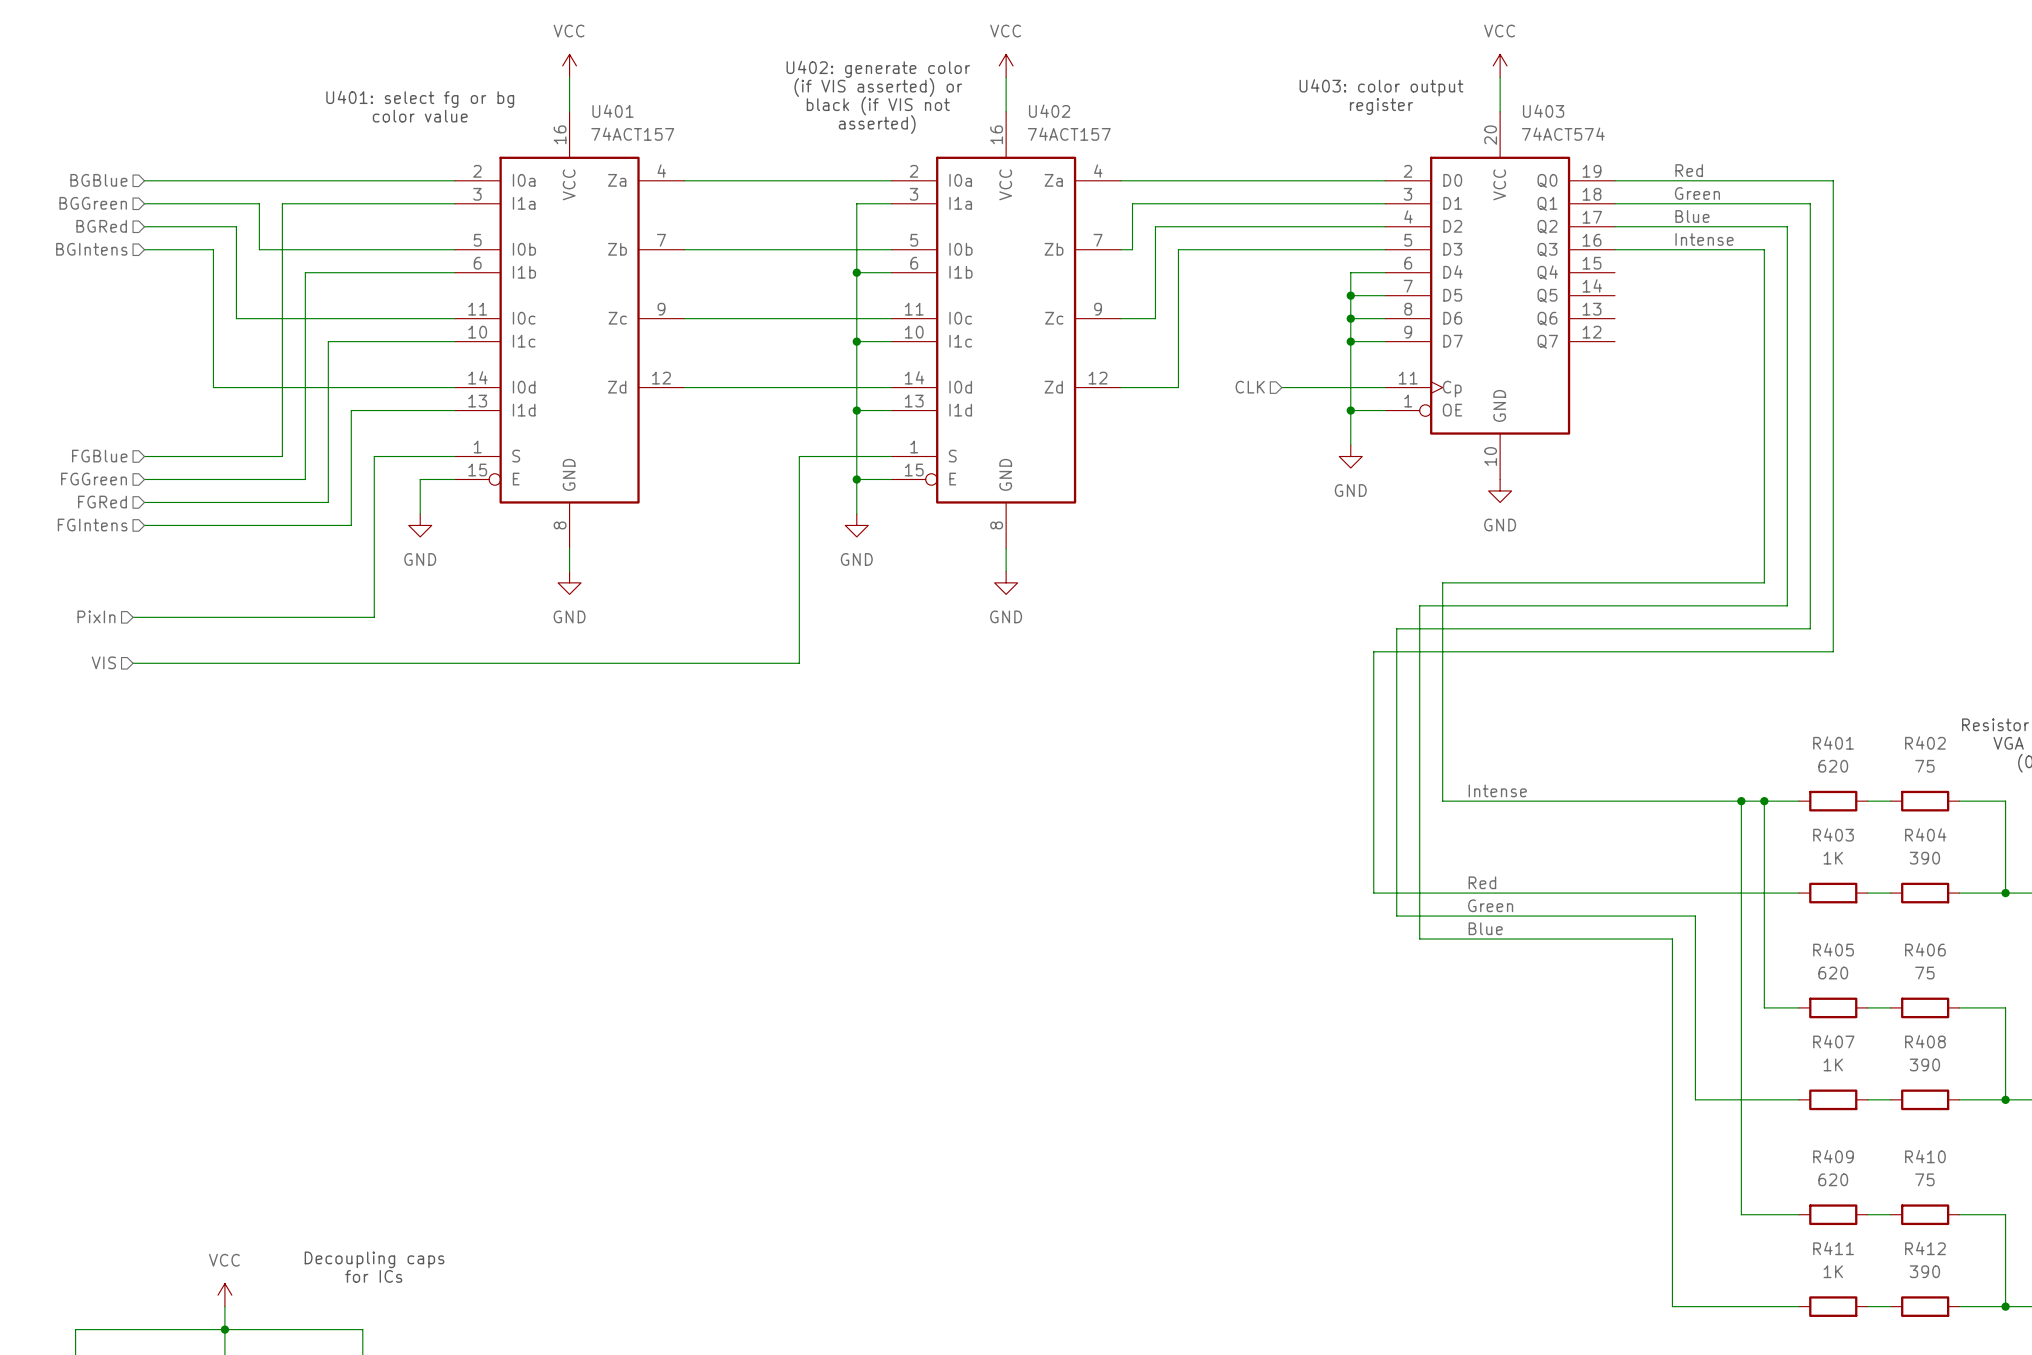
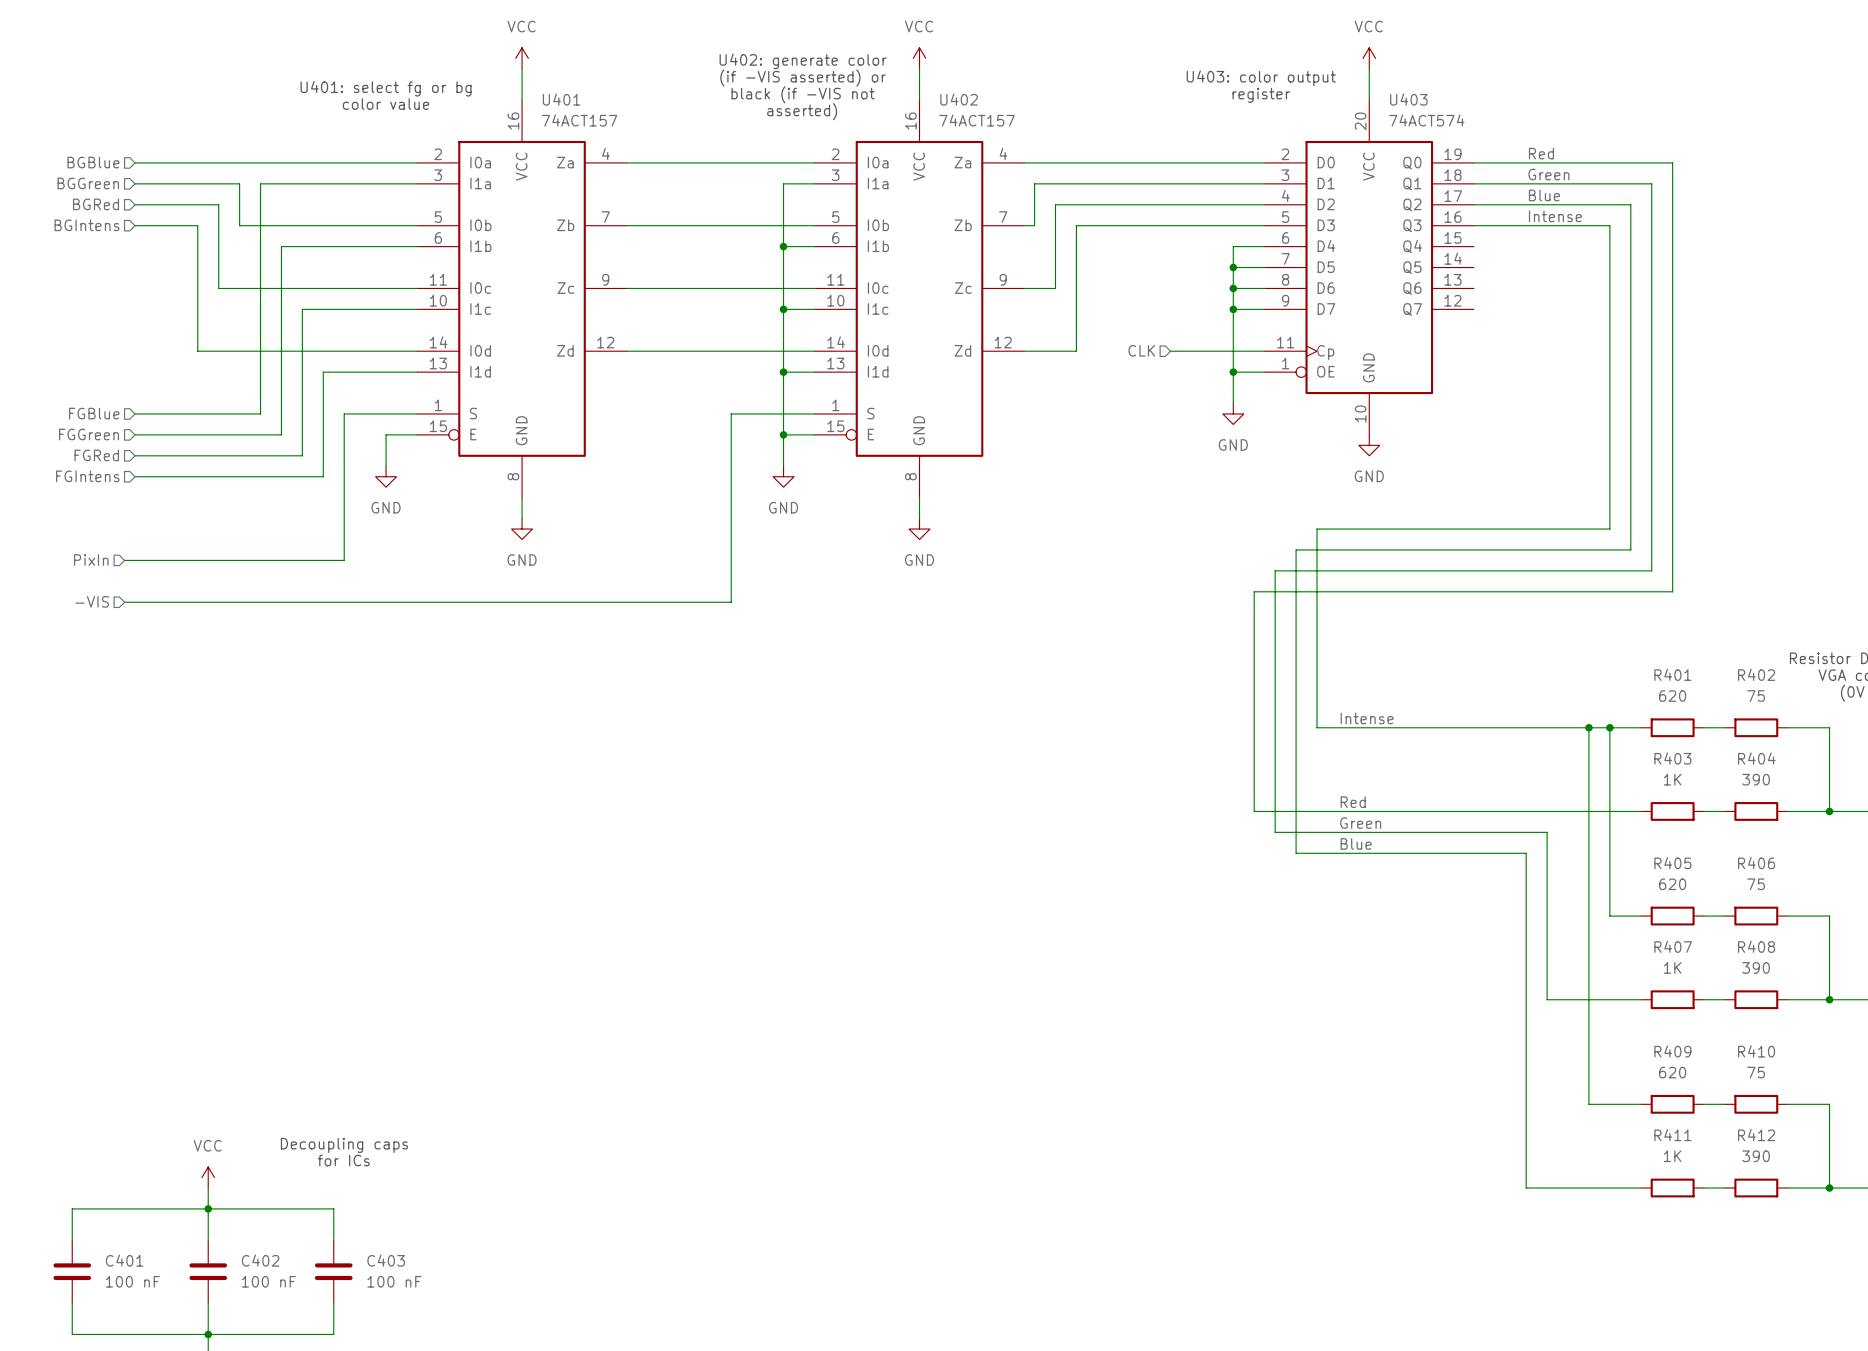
text: (if VIS asserted) or (878, 87) -> (if -VIS asserted) or (803, 77)
text: black (if VIS not (878, 106) -> black (if -VIS not (803, 94)
hierarchical label: VIS (103, 662) -> -VIS (92, 601)

